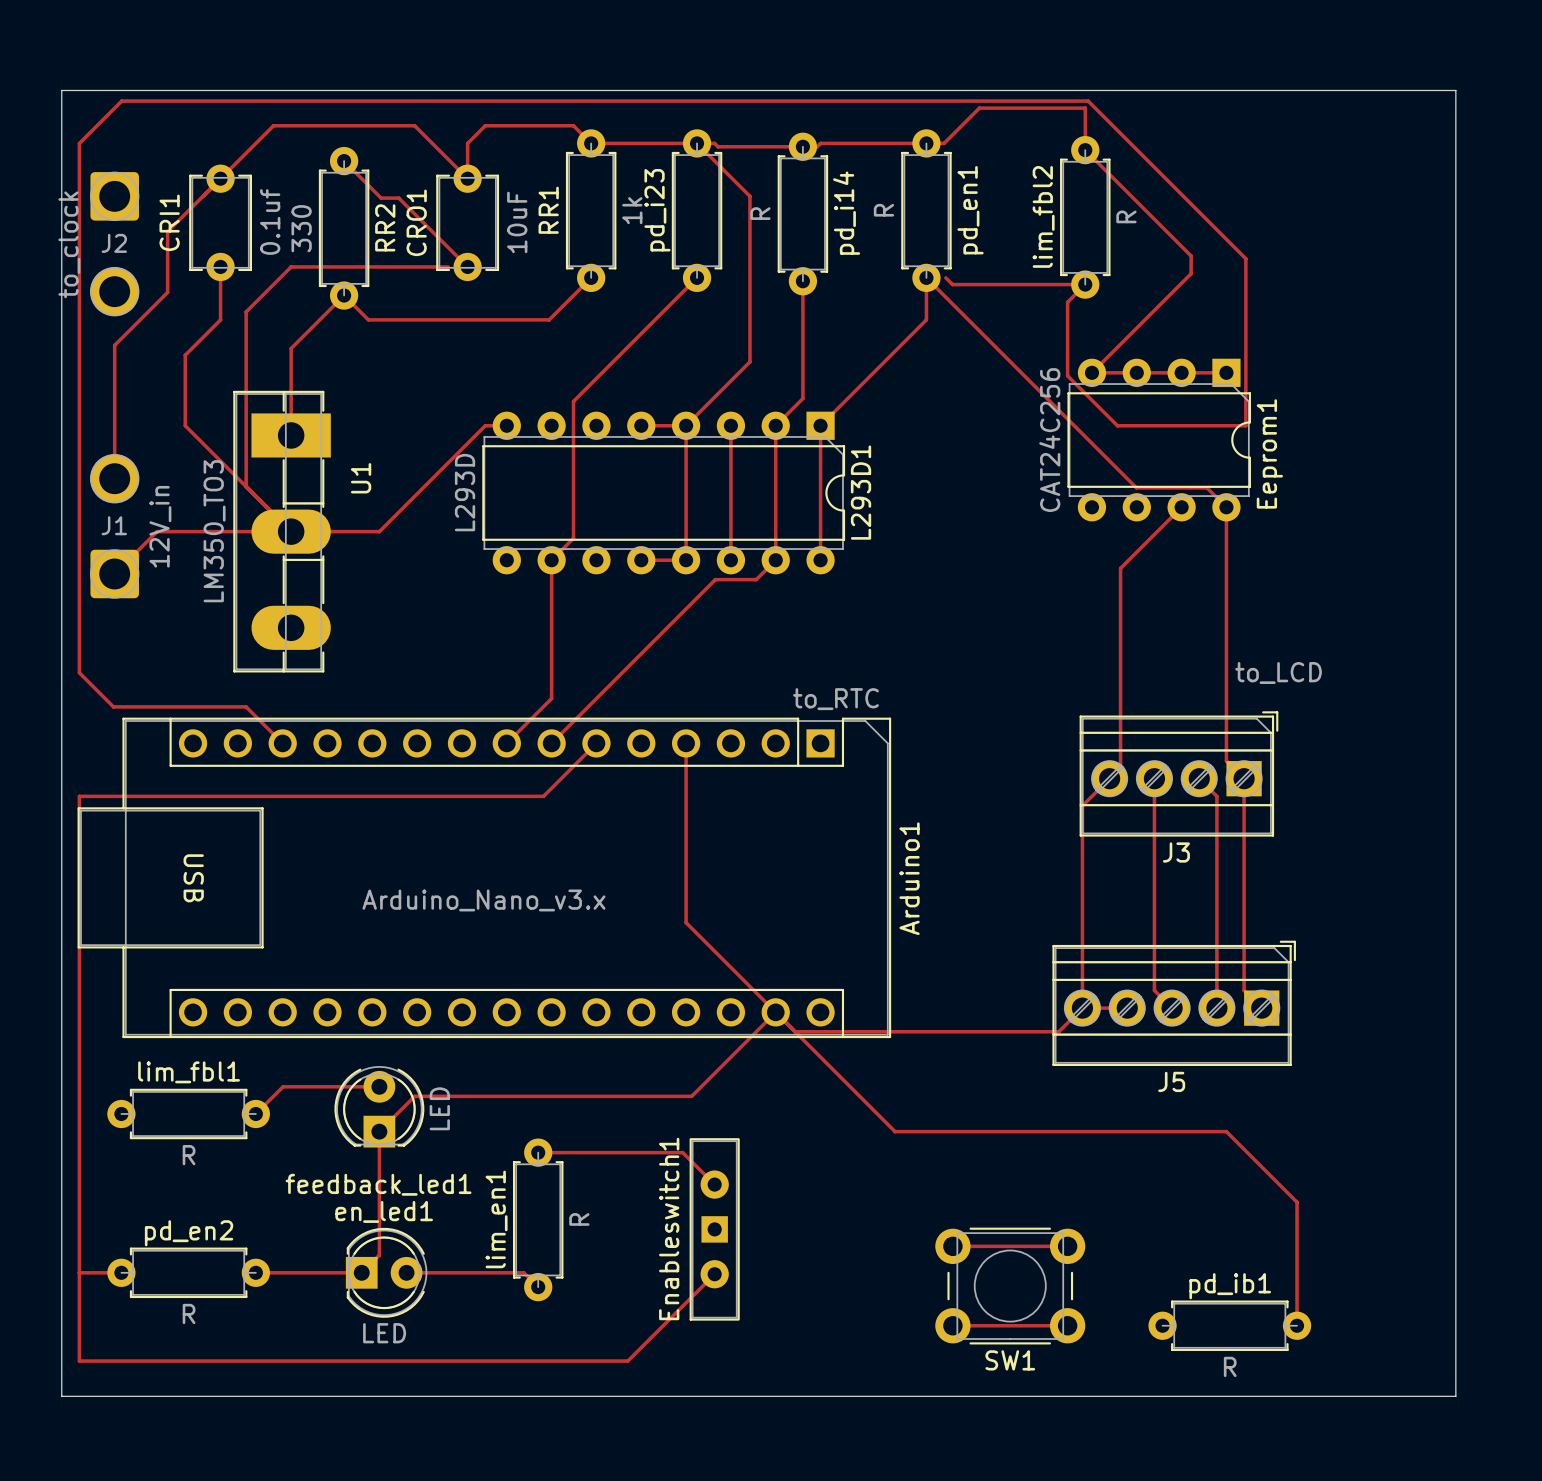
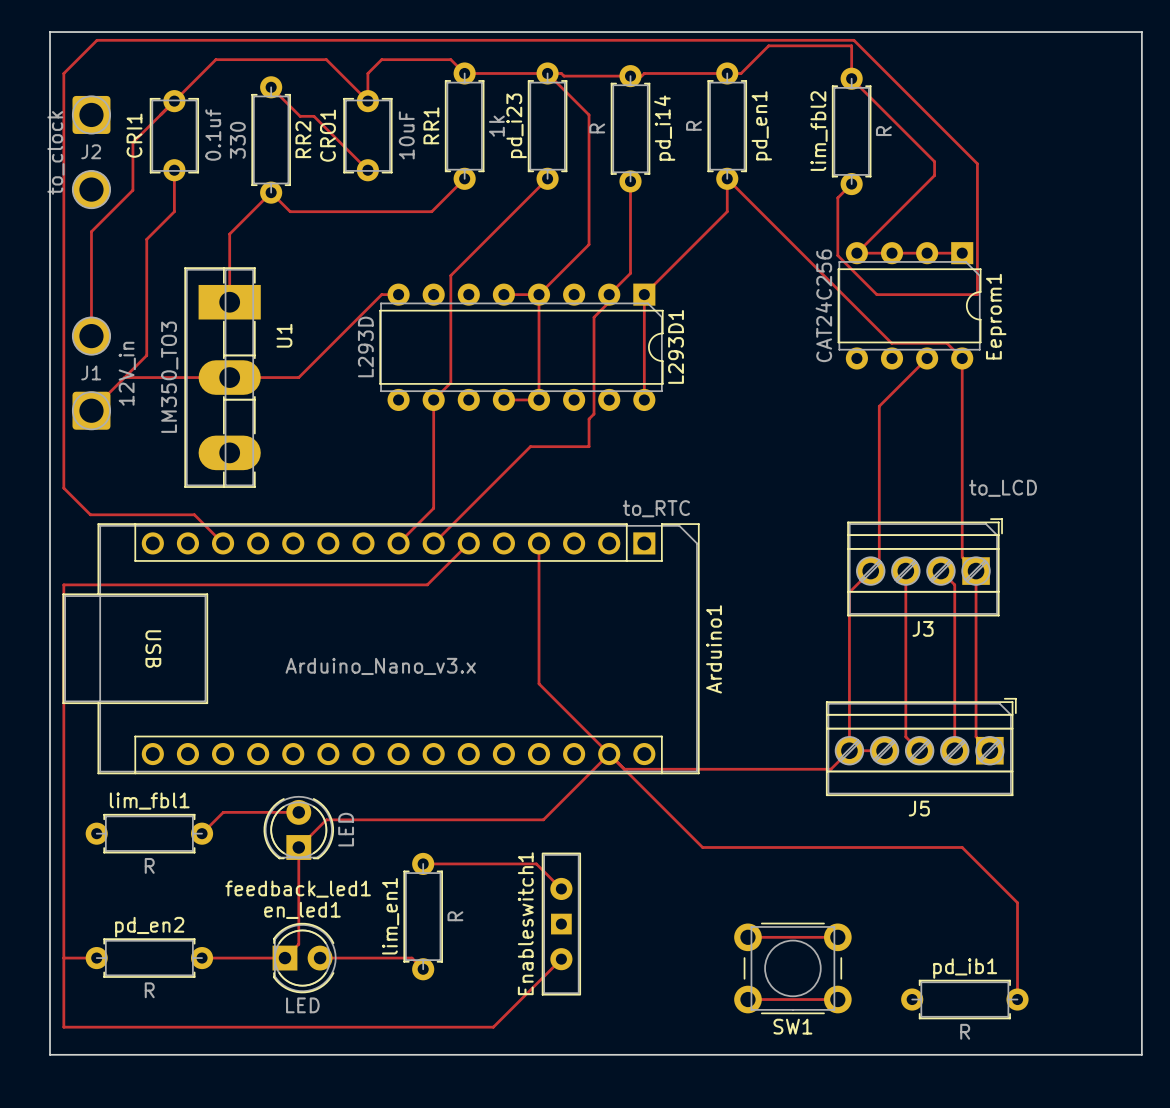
track: (448, 266) (291, 266) (246, 311) (246, 486) -> none
track: (945, 277) (952, 284) (1085, 284) -> none
track: (185, 425) (291, 531) -> (146, 294) (146, 355) (124, 377)
track: (730, 425) (730, 560) -> none
track: (775, 435) (775, 560) (756, 579) (715, 579) (675, 619) -> (609, 302) (594, 317) (594, 414) (589, 419) (589, 446) (530, 446)

